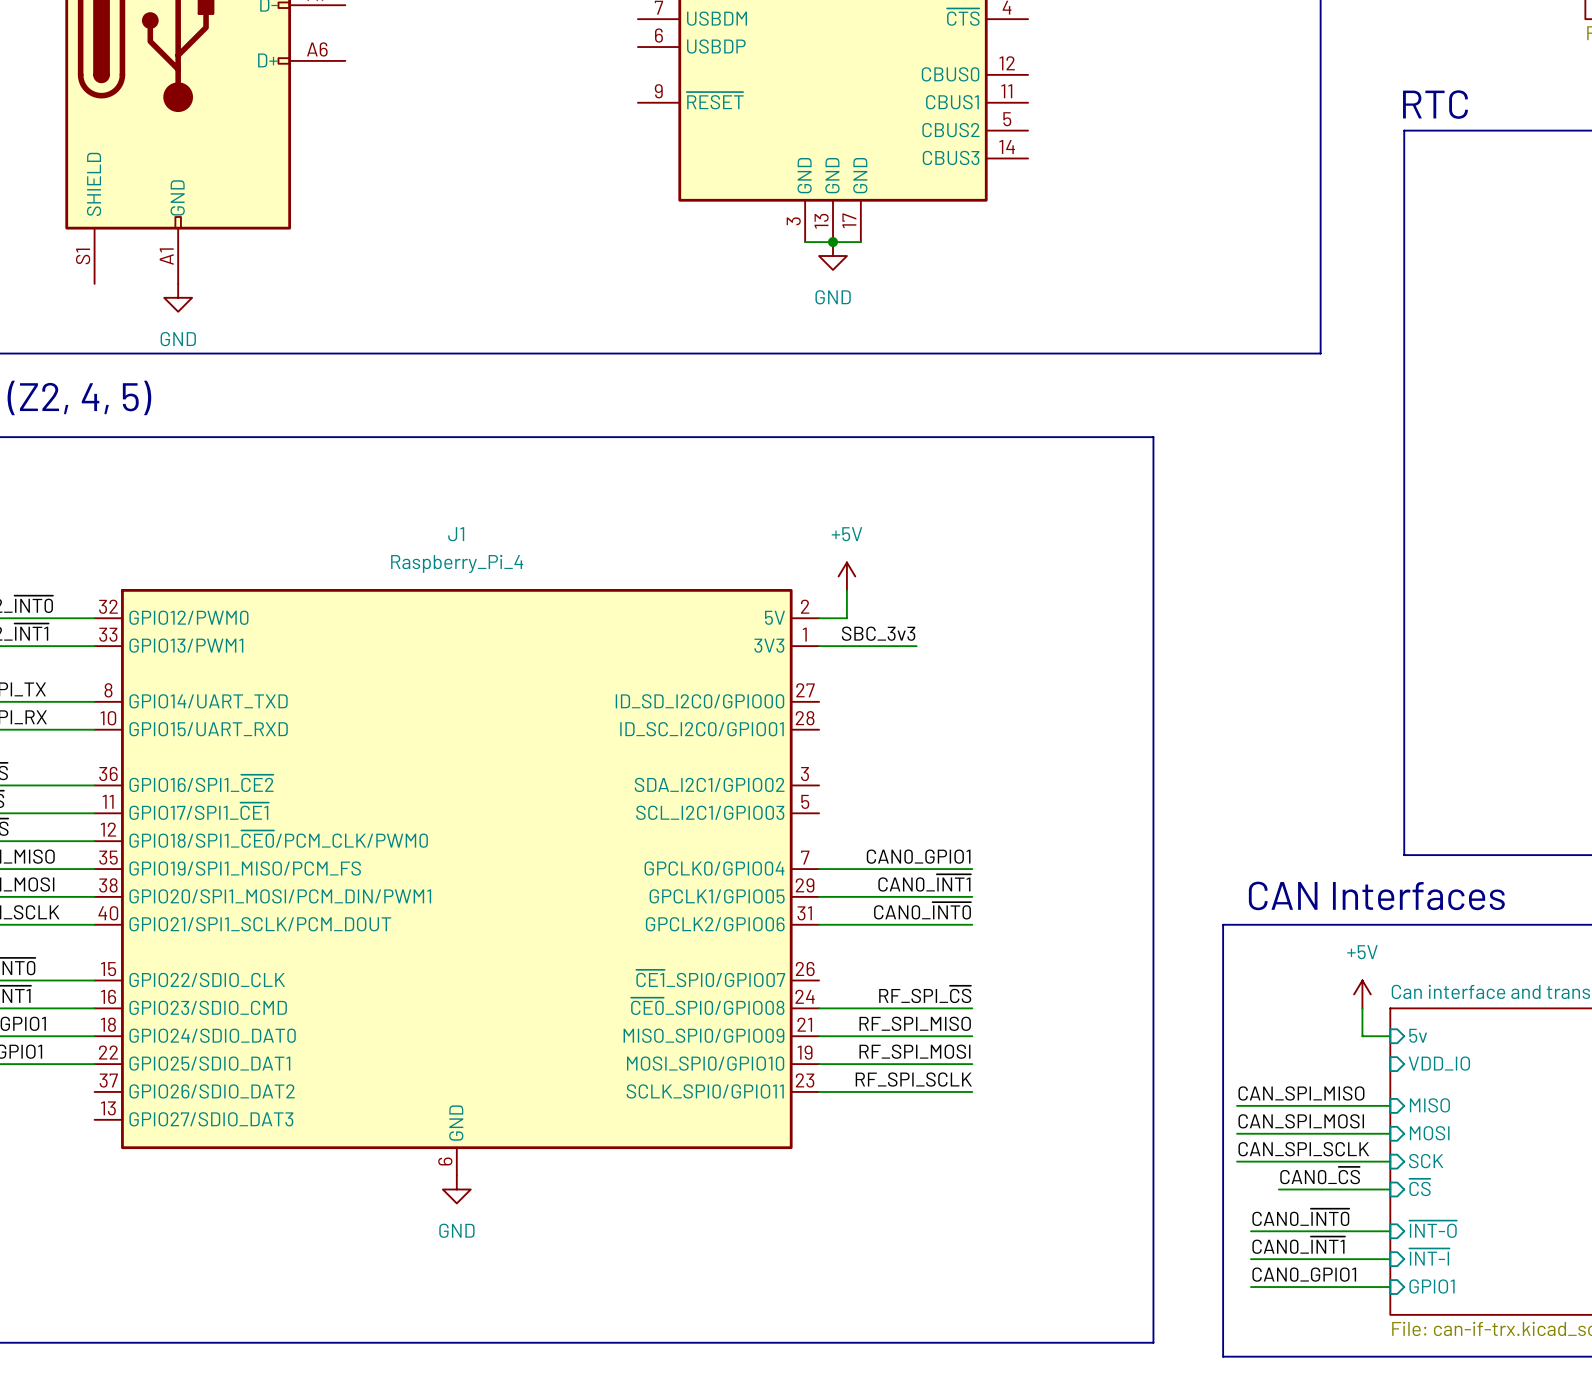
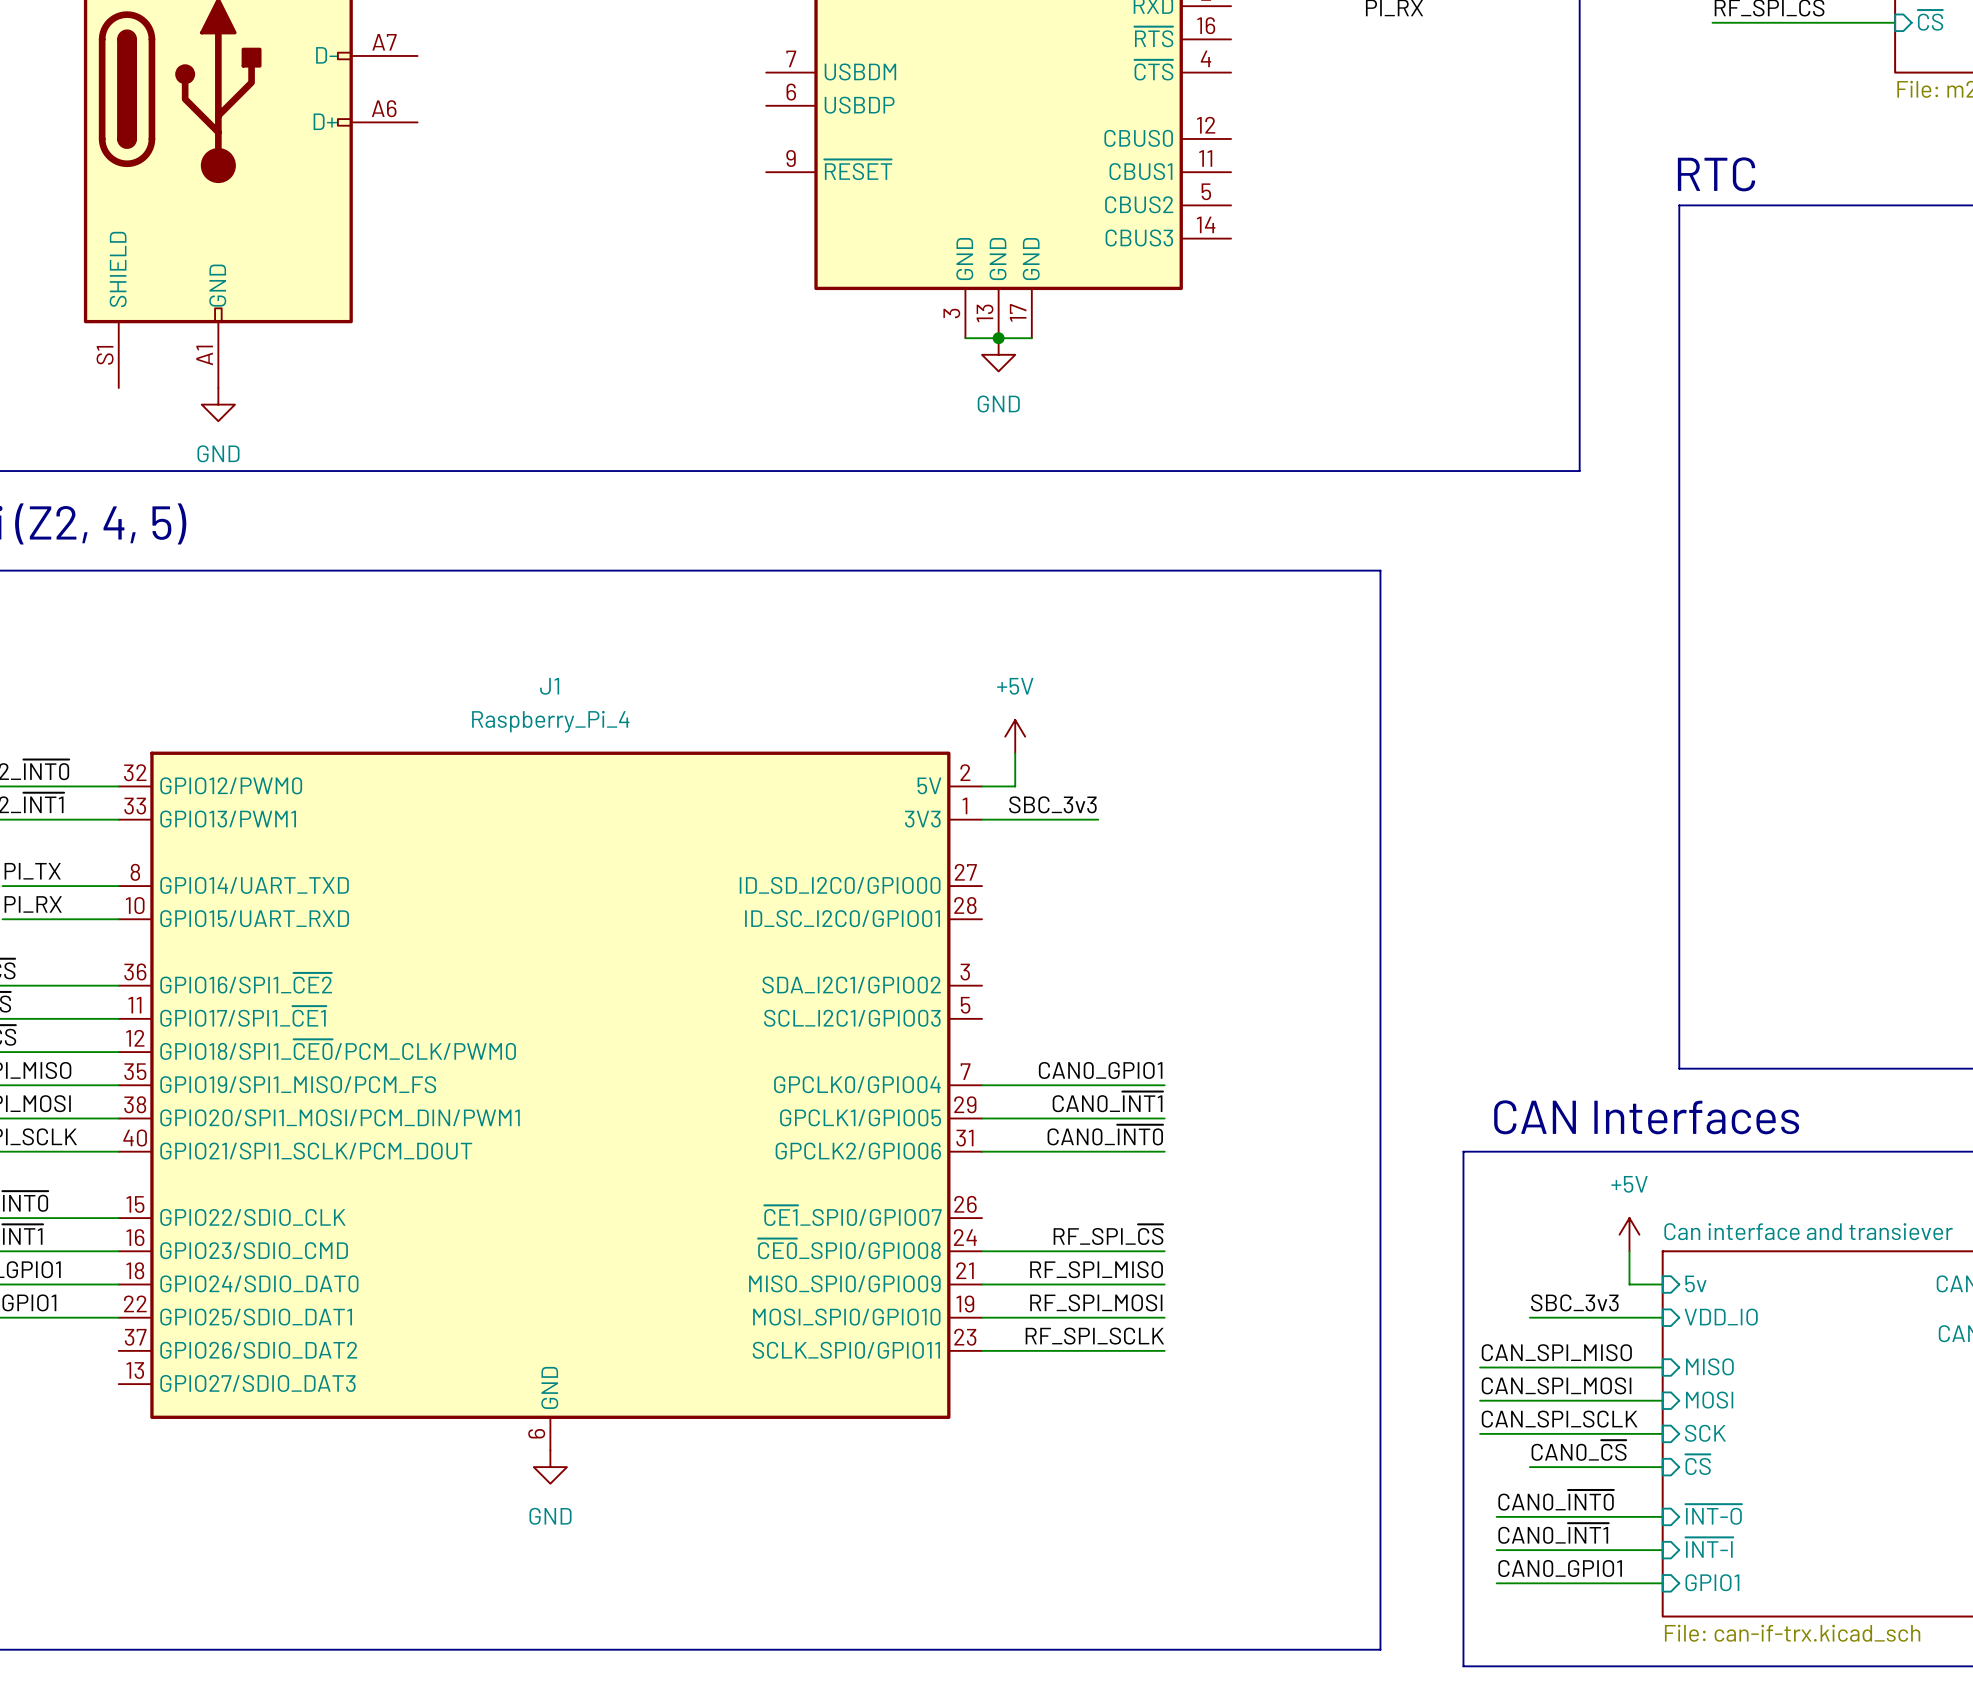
label: none -> SBC_3v3 (1574, 1302)
wire: none -> (1529, 1317) (1662, 1317)

